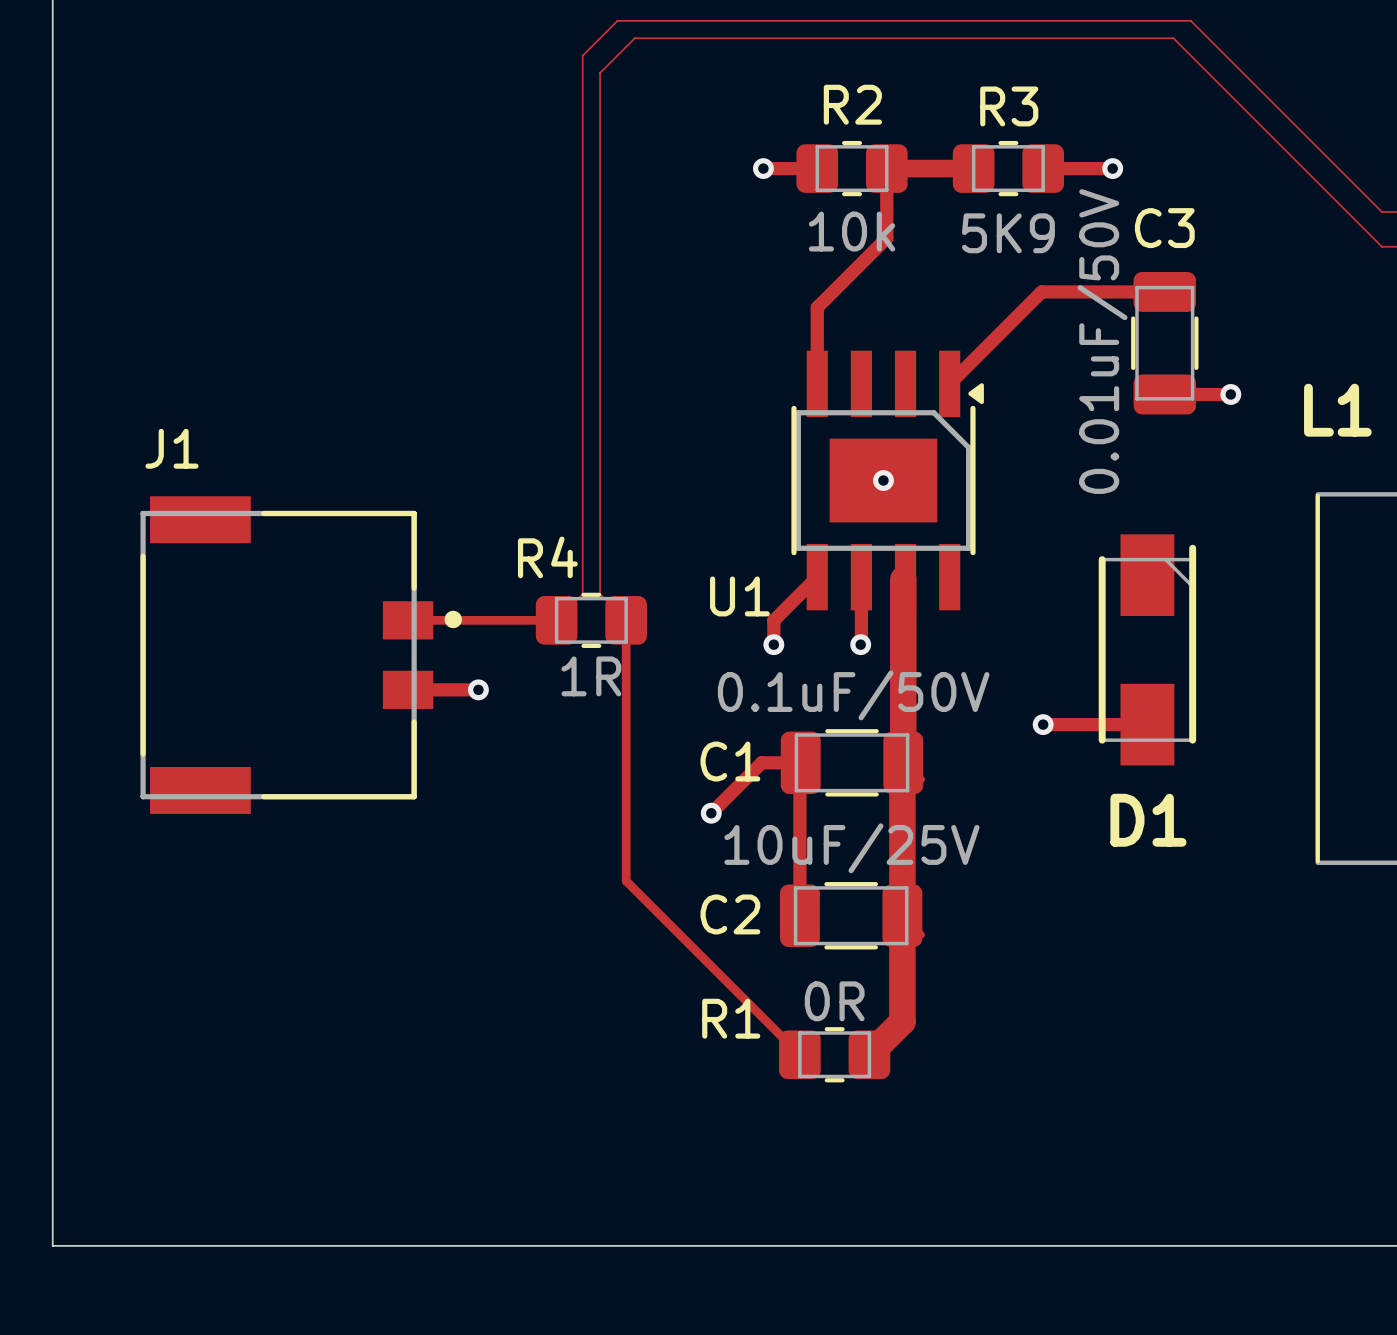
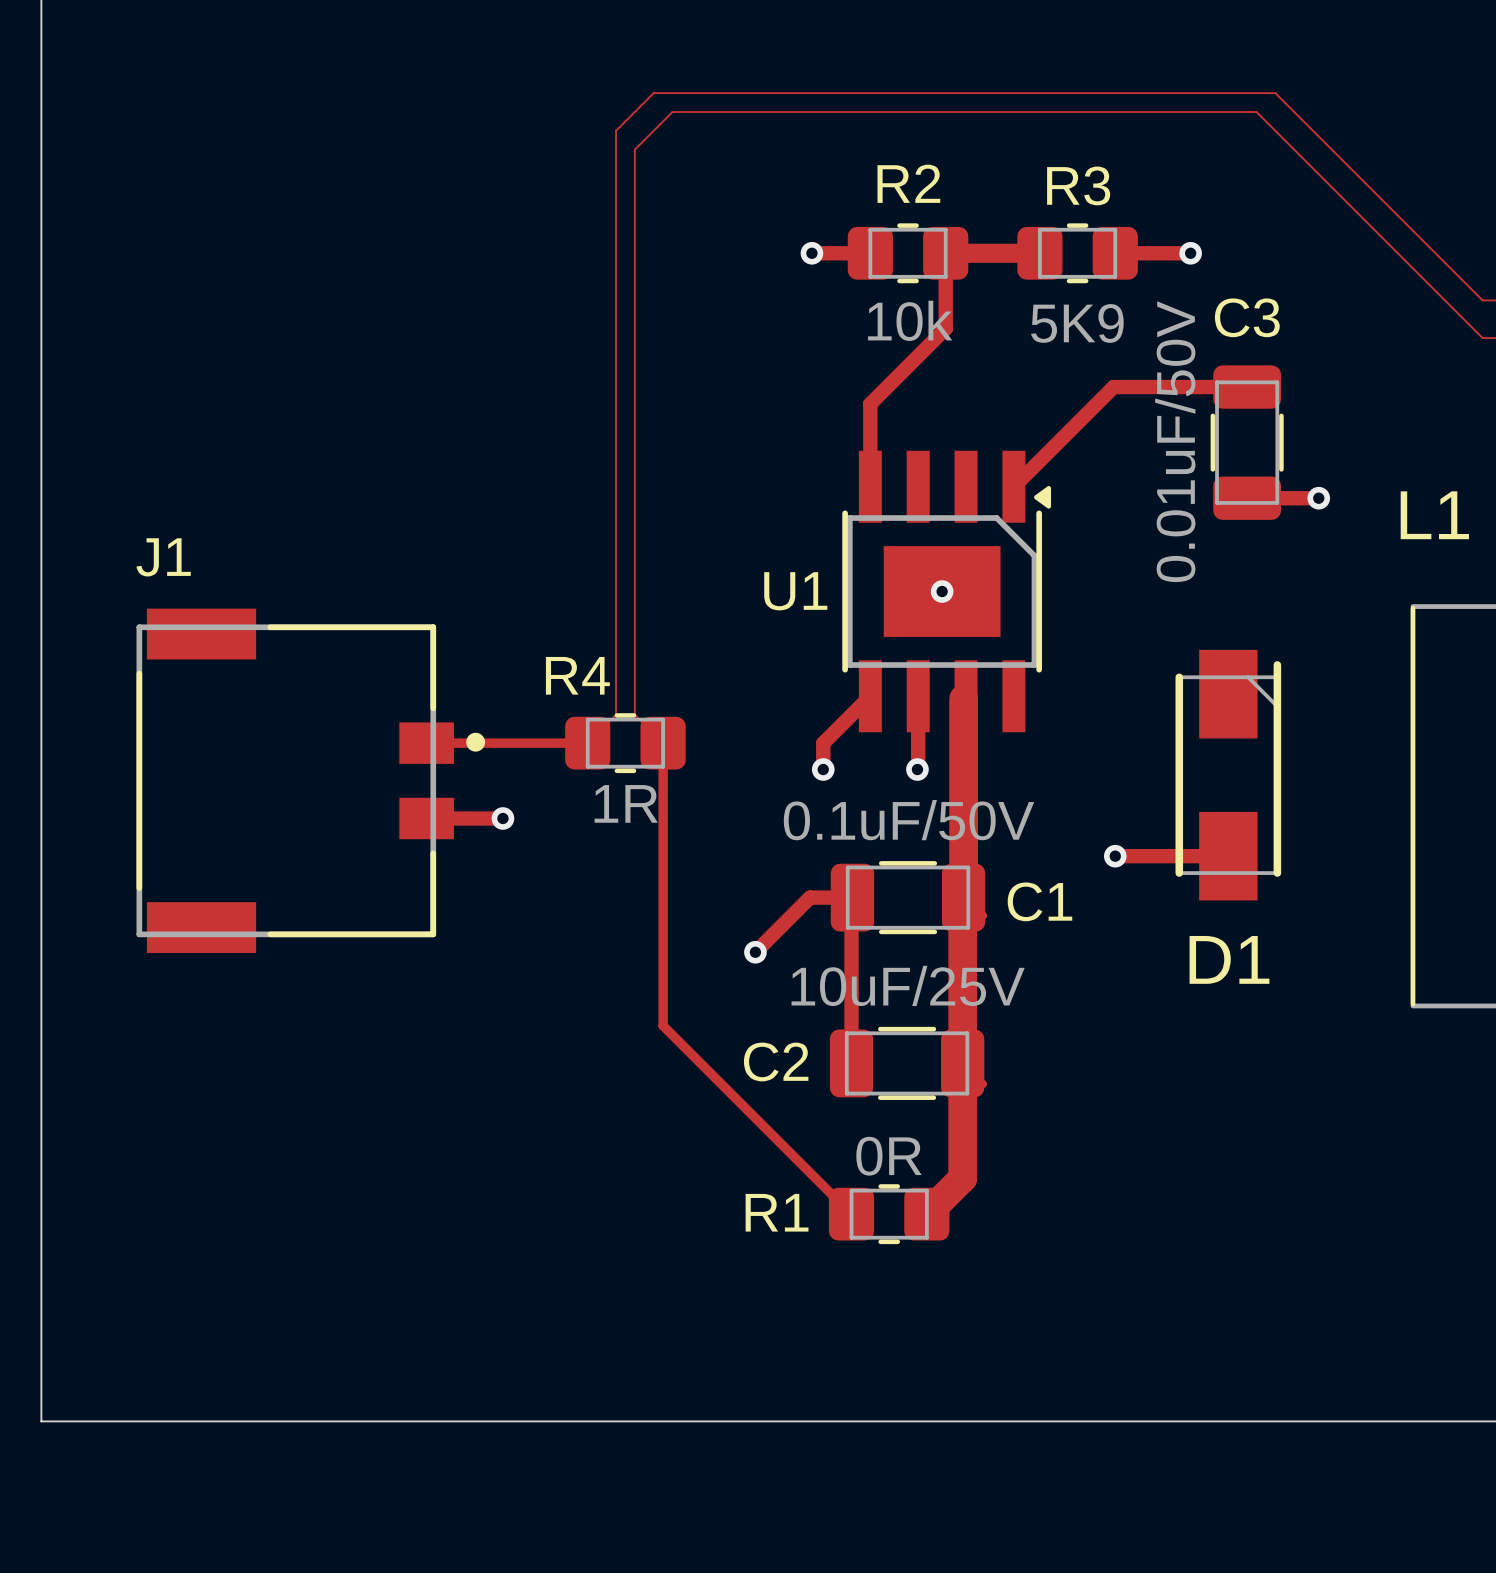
U1 name position: U1 (739, 596) -> U1 (795, 591)
C1 name position: C1 (730, 761) -> C1 (1039, 901)
R1 name position: R1 (731, 1018) -> R1 (777, 1212)

